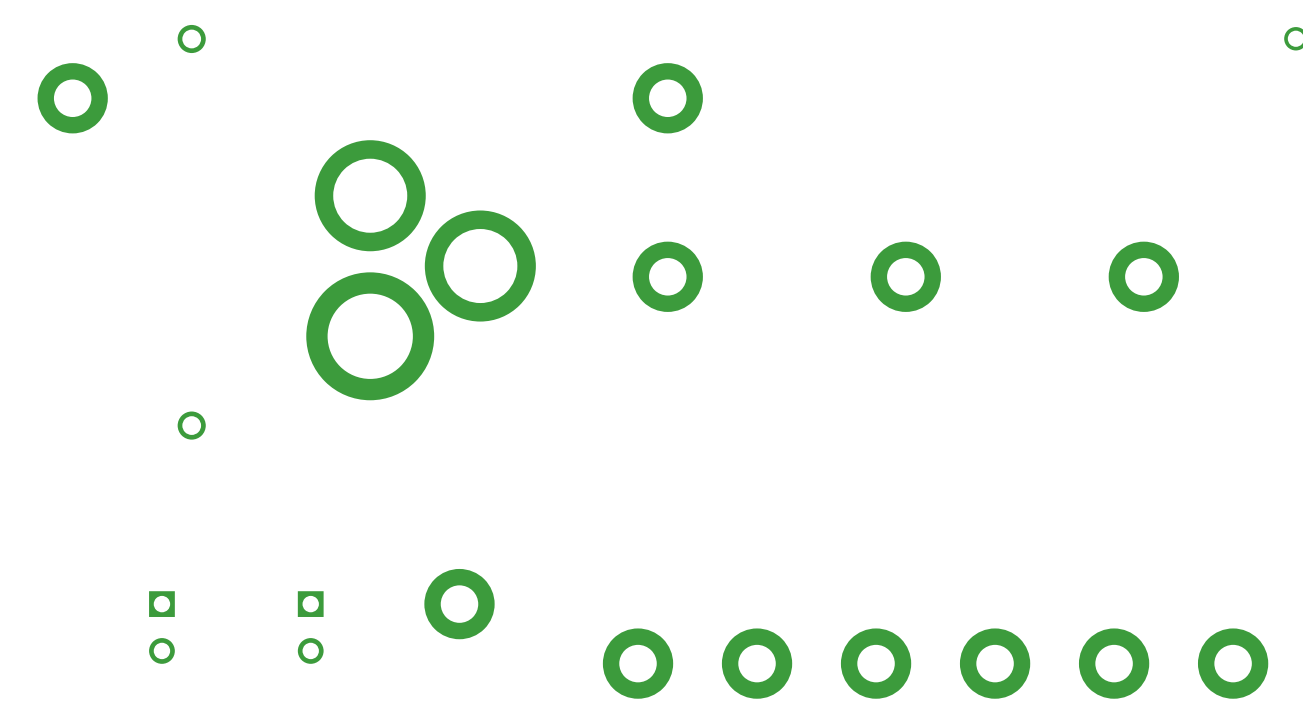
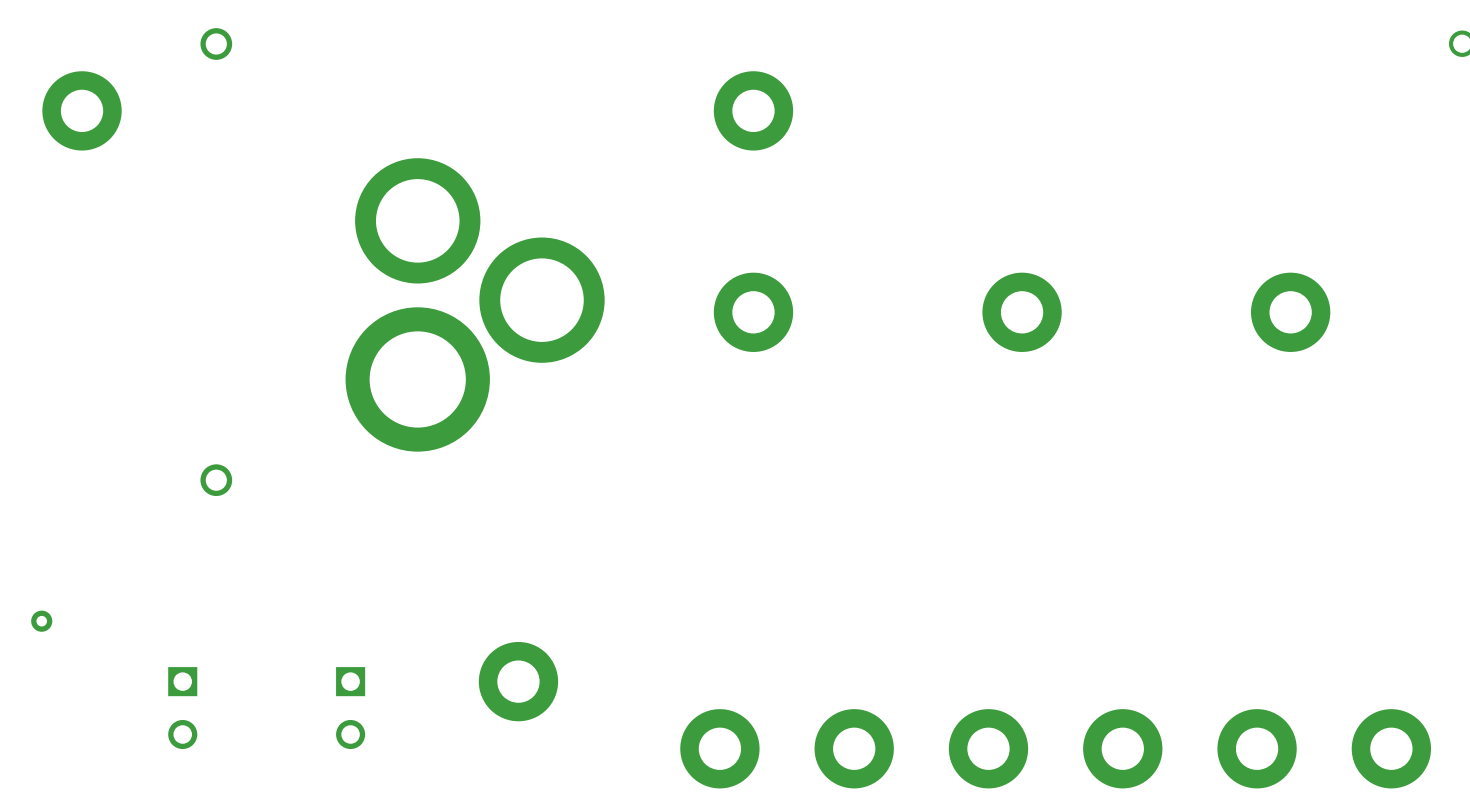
via: none -> (41, 621)

